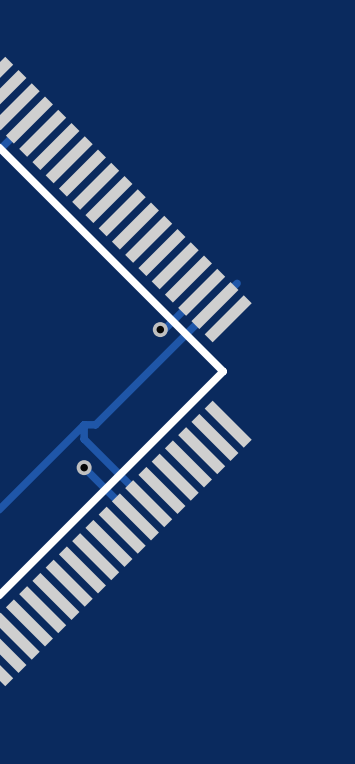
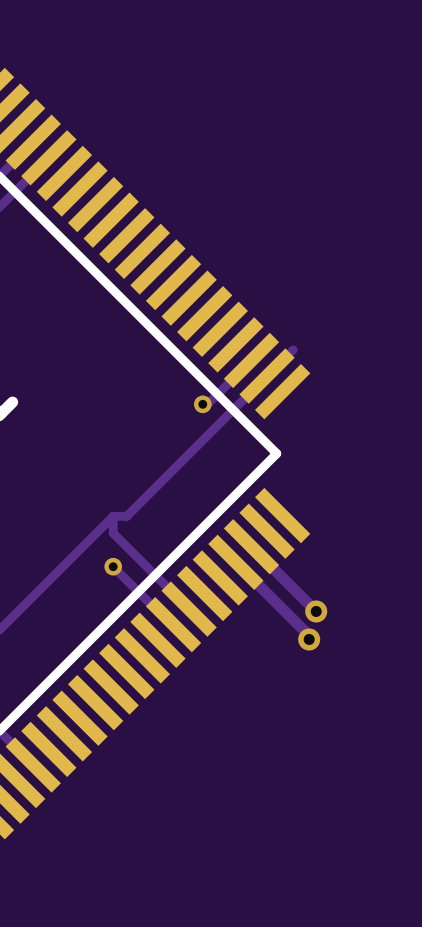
track: none -> (251, 546) (316, 611)
track: none -> (235, 562) (309, 635) (309, 639)
via: none -> (316, 611)
via: none -> (309, 639)

